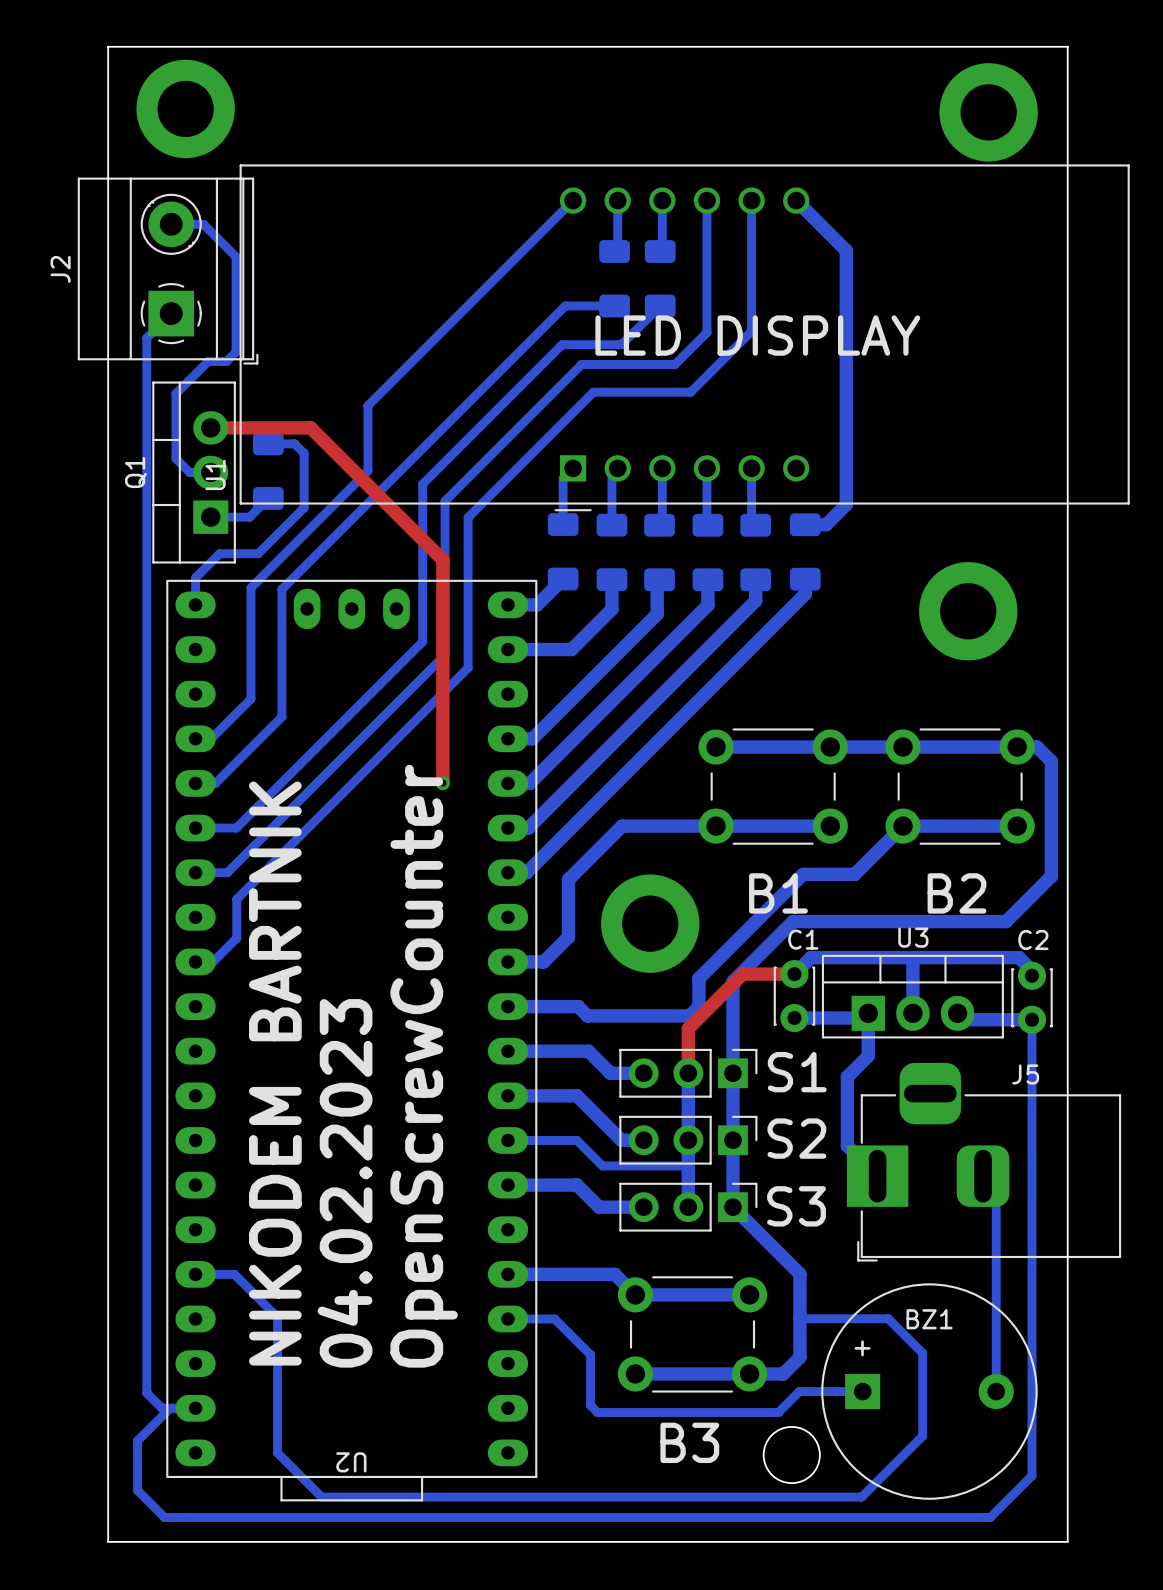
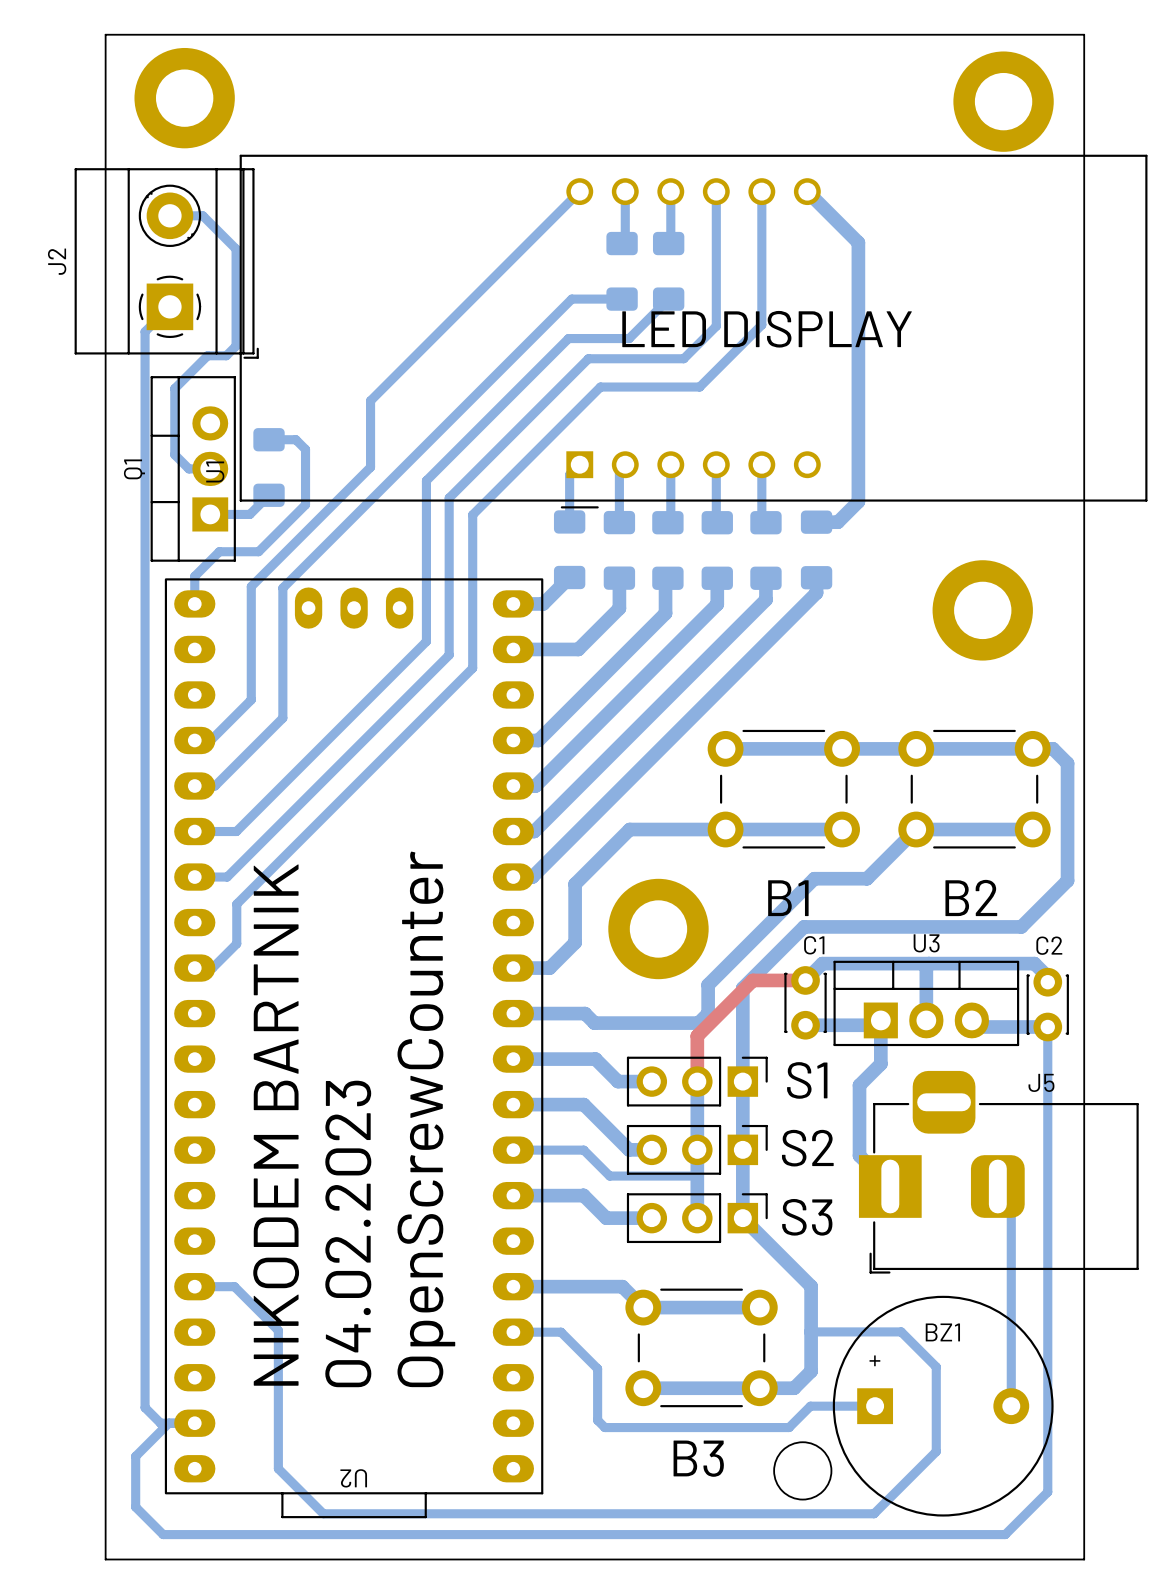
top track: (210, 427) (310, 427) (442, 560) (442, 783) -> none
via: (442, 783) -> none

